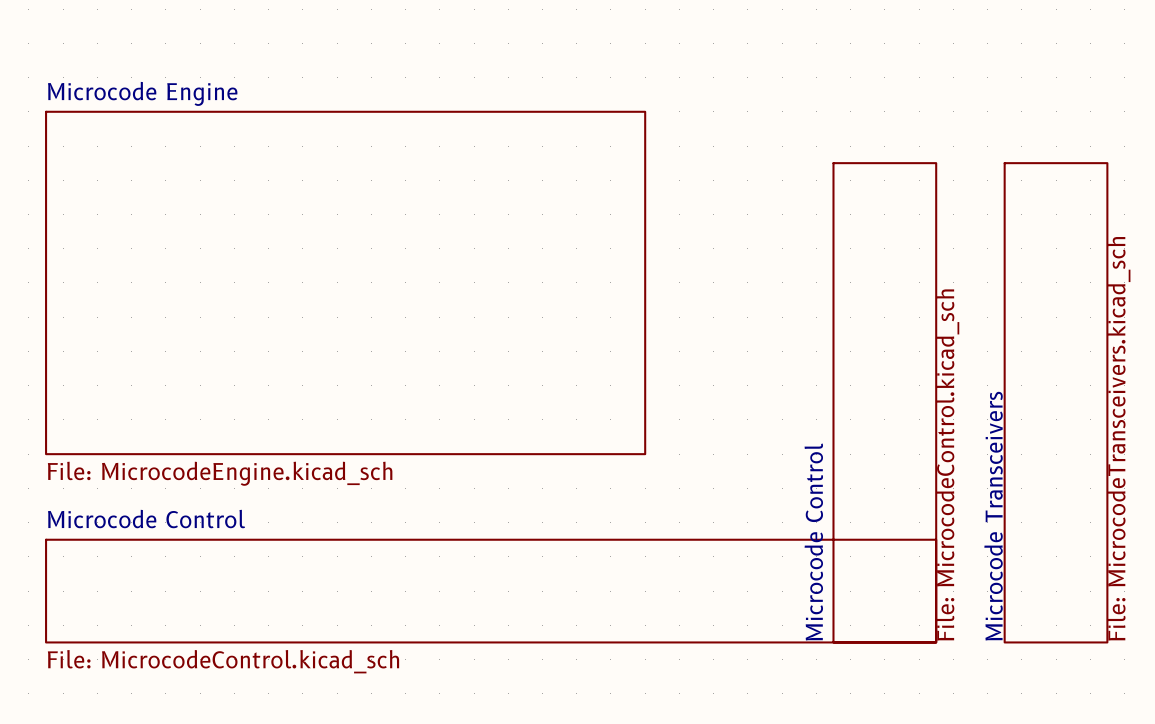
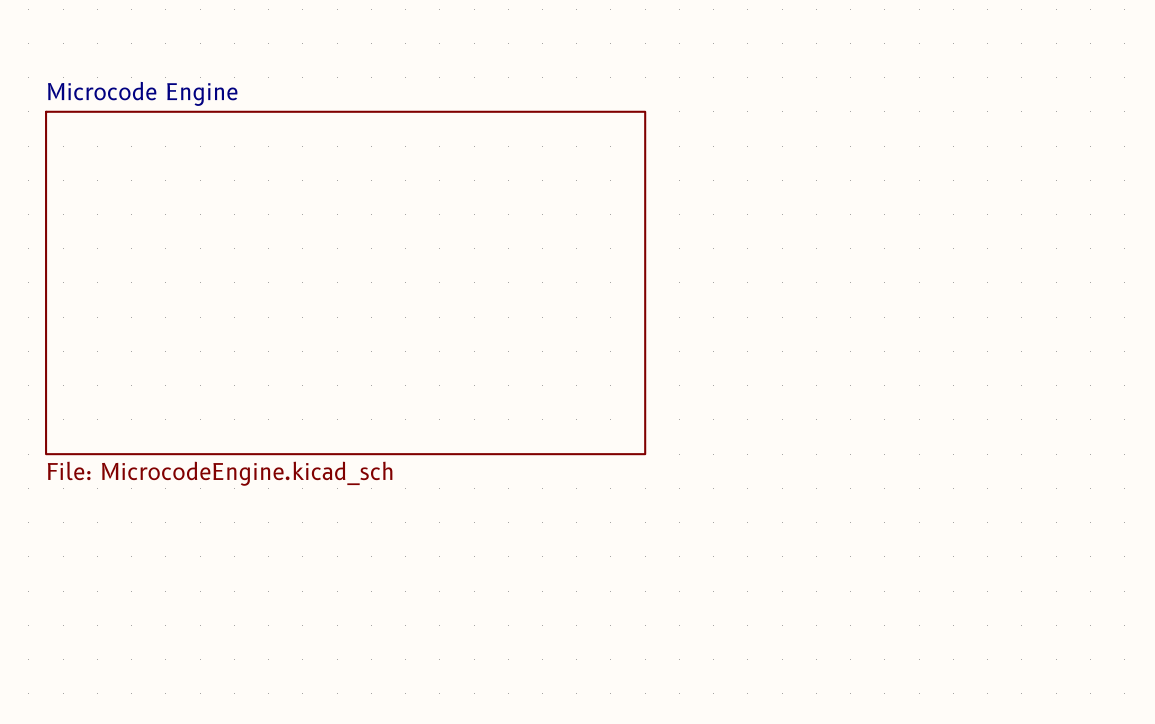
sheet Microcode Control: File: MicrocodeControl.kicad_sch (884, 402) -> none
sheet Microcode Transceivers: File: MicrocodeTransceivers.kicad_sch (1056, 402) -> none
sheet Microcode Control: File: MicrocodeControl.kicad_sch (491, 591) -> none

